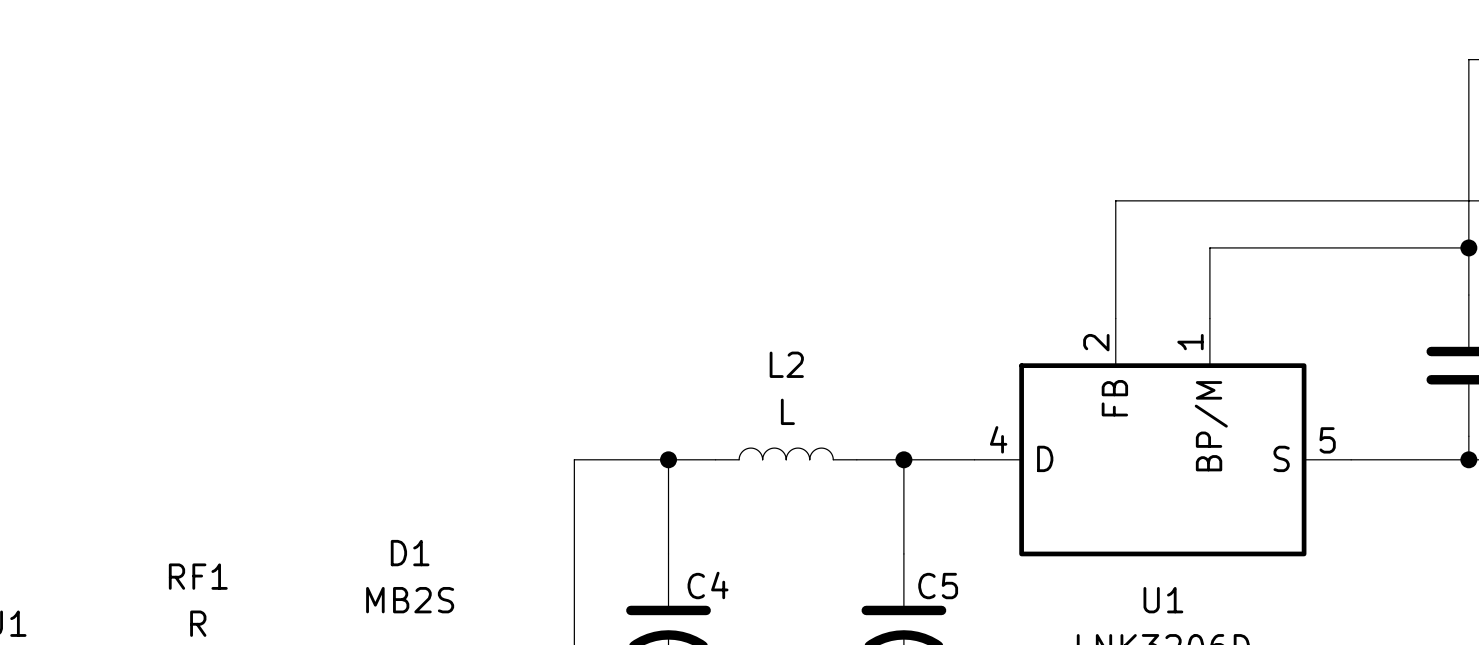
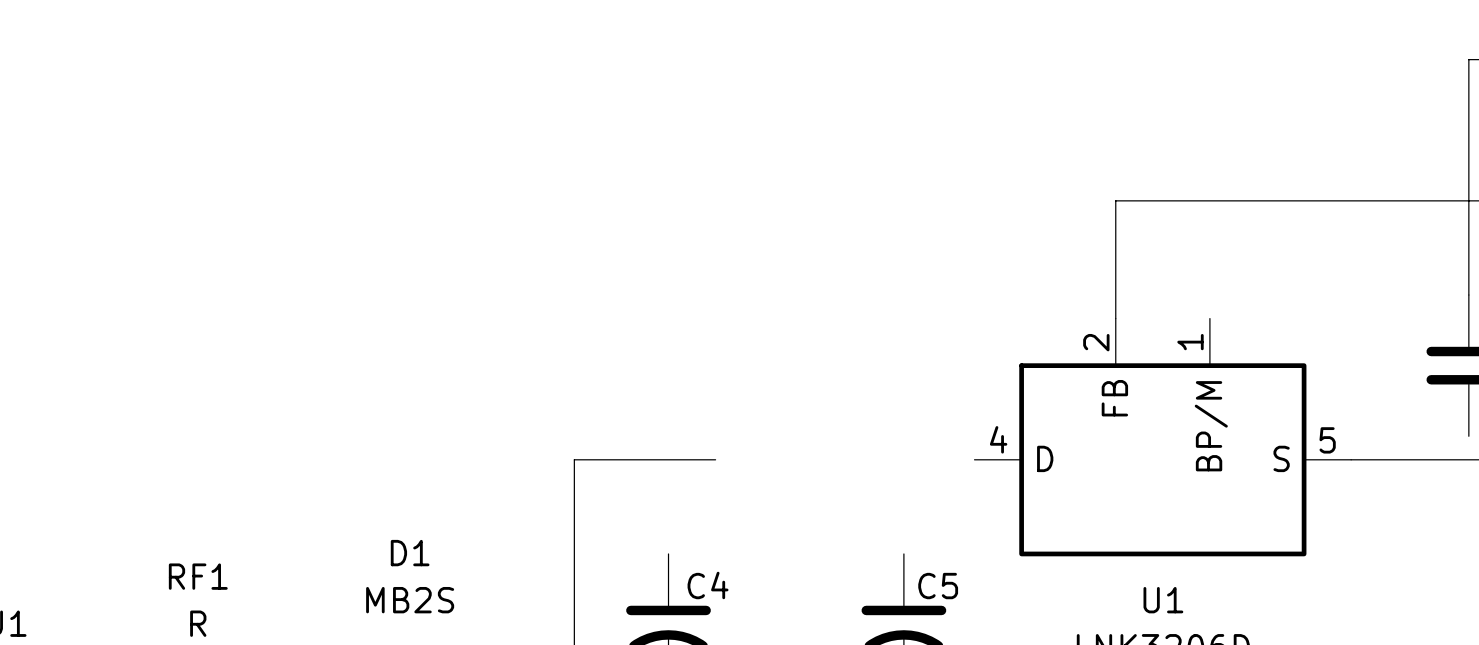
wire: (1468, 247) (1209, 247) (1209, 318) -> none
junction: (1468, 247) -> none
wire: (1468, 436) (1468, 459) -> none
L2: L (786, 453) -> none
wire: (668, 459) (668, 553) -> none
junction: (668, 459) -> none
wire: (856, 459) (974, 459) -> none
wire: (903, 459) (903, 553) -> none
junction: (903, 459) -> none
junction: (1468, 459) -> none

